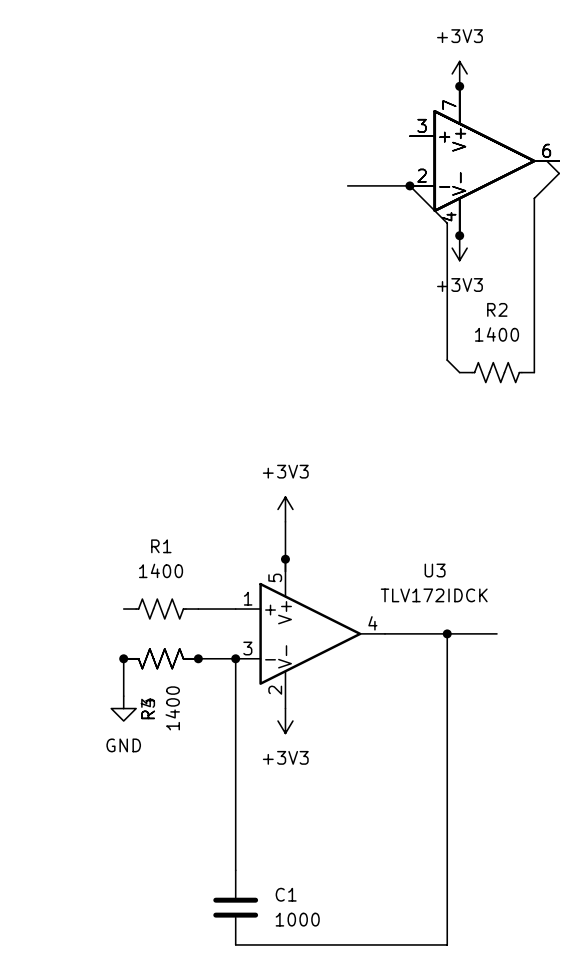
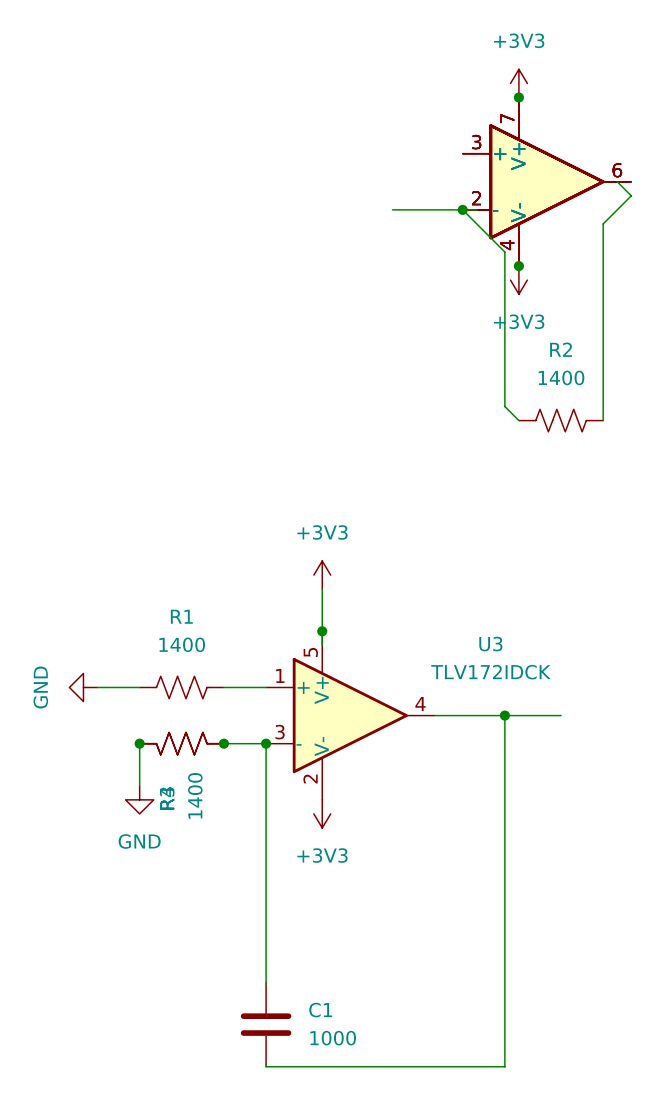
power symbol: none -> GND (83, 687)
wire: none -> (97, 687) (139, 687)

